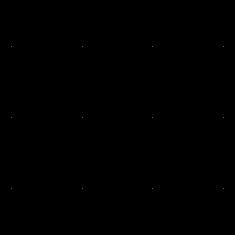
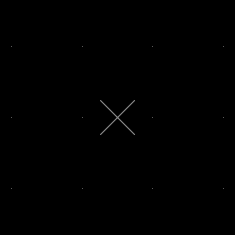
no-connect mark: none -> (117, 117)

